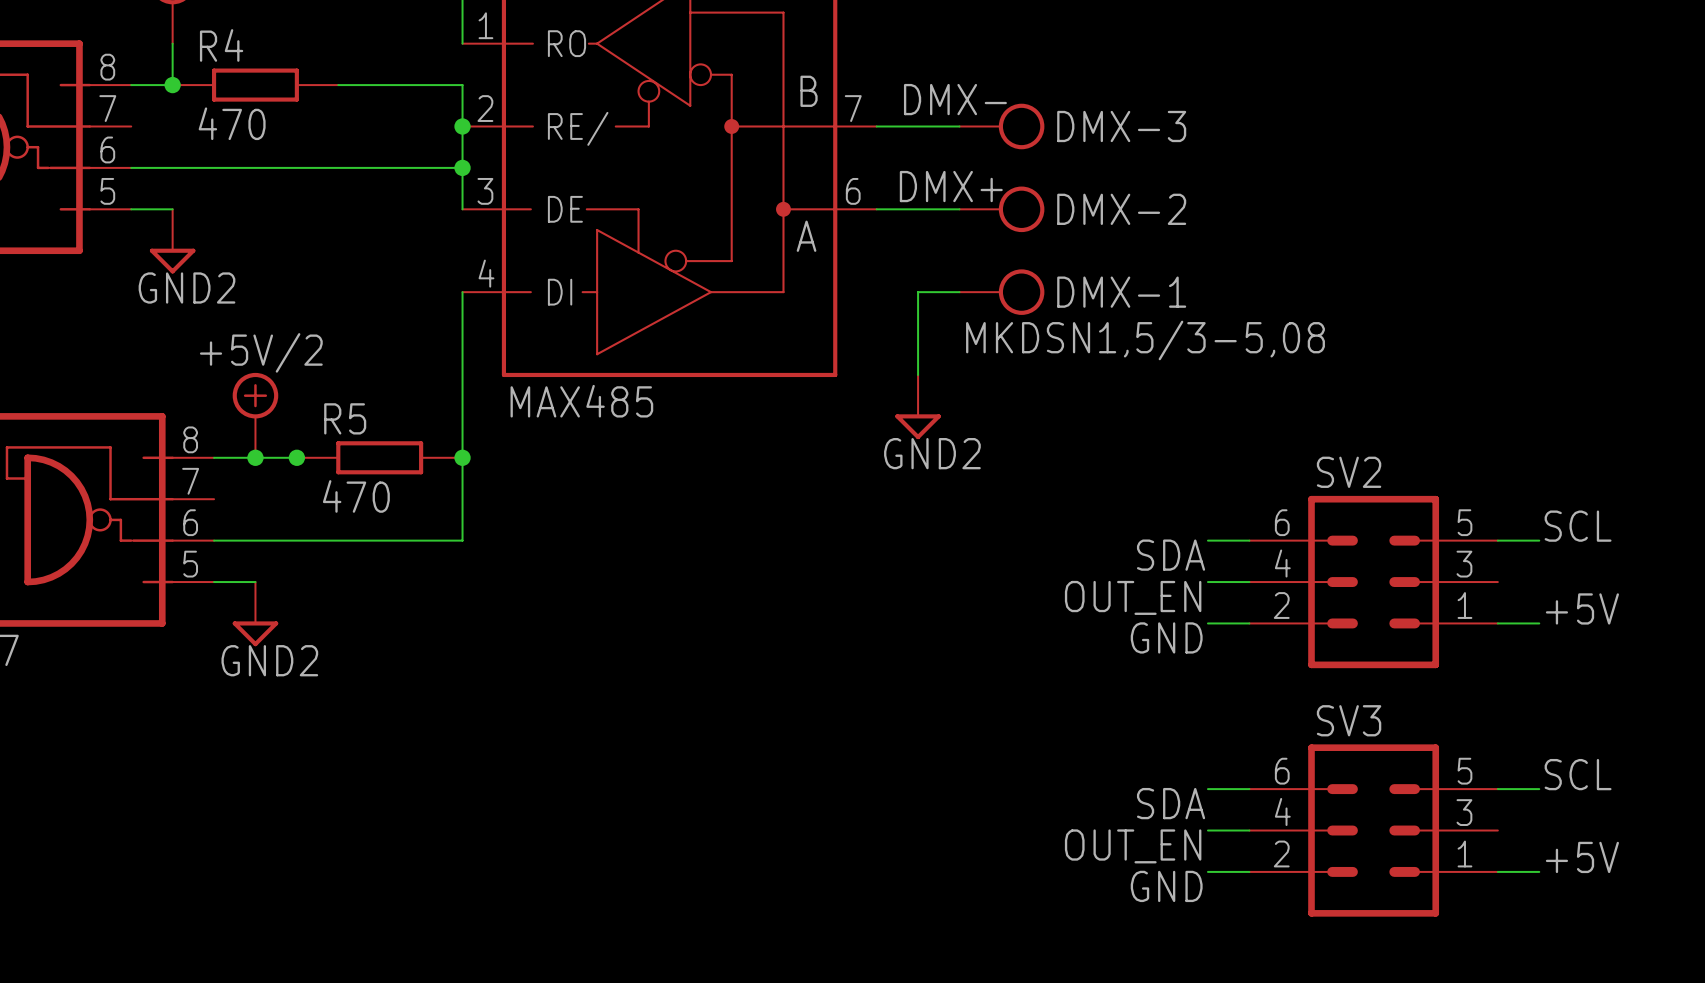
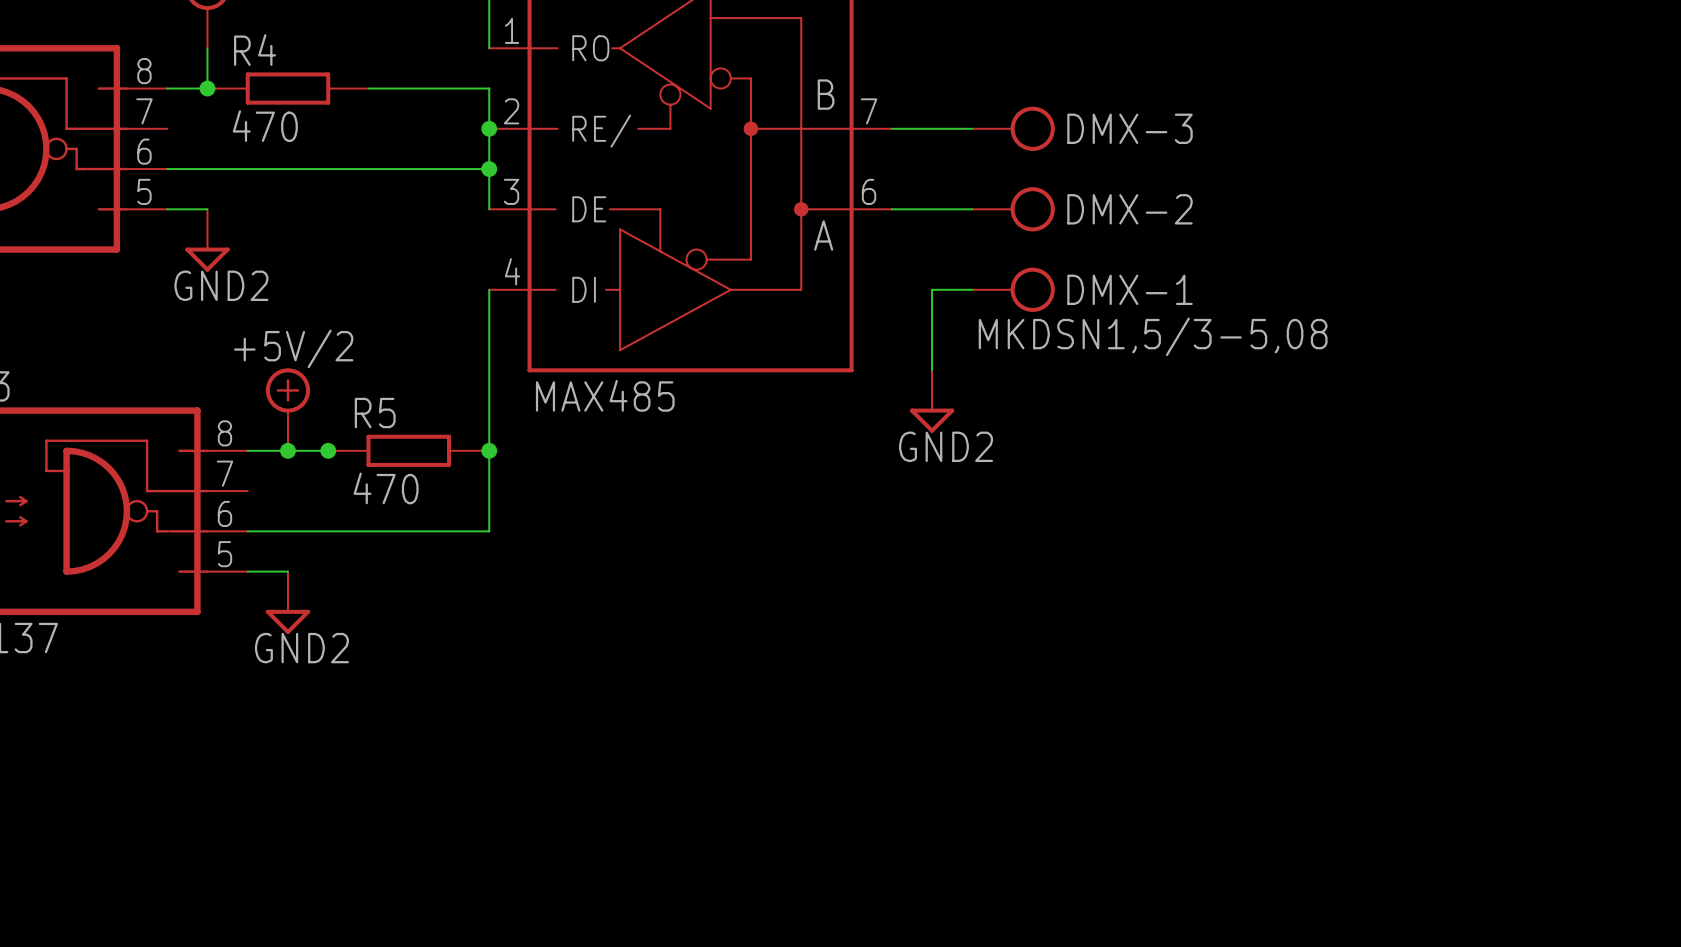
label: DMX- (955, 99) -> none
label: DMX+ (951, 186) -> none
label: SCL (1578, 526) -> none
wire: (1207, 540) (1249, 540) -> none
wire: (1497, 540) (1539, 540) -> none
label: SDA (1171, 555) -> none
wire: (1207, 582) (1249, 582) -> none
SV2: (1373, 582) -> none
label: OUT_EN (1133, 597) -> none
label: +5V (1582, 608) -> none
wire: (1207, 623) (1249, 623) -> none
wire: (1497, 623) (1539, 623) -> none
label: GND (1166, 637) -> none
label: SCL (1578, 774) -> none
wire: (1207, 789) (1249, 789) -> none
wire: (1497, 789) (1539, 789) -> none
label: SDA (1171, 803) -> none
wire: (1207, 830) (1249, 830) -> none
SV3: (1373, 830) -> none
label: OUT_EN (1133, 846) -> none
label: +5V (1582, 857) -> none
wire: (1207, 871) (1249, 871) -> none
wire: (1497, 871) (1539, 871) -> none
label: GND (1166, 886) -> none

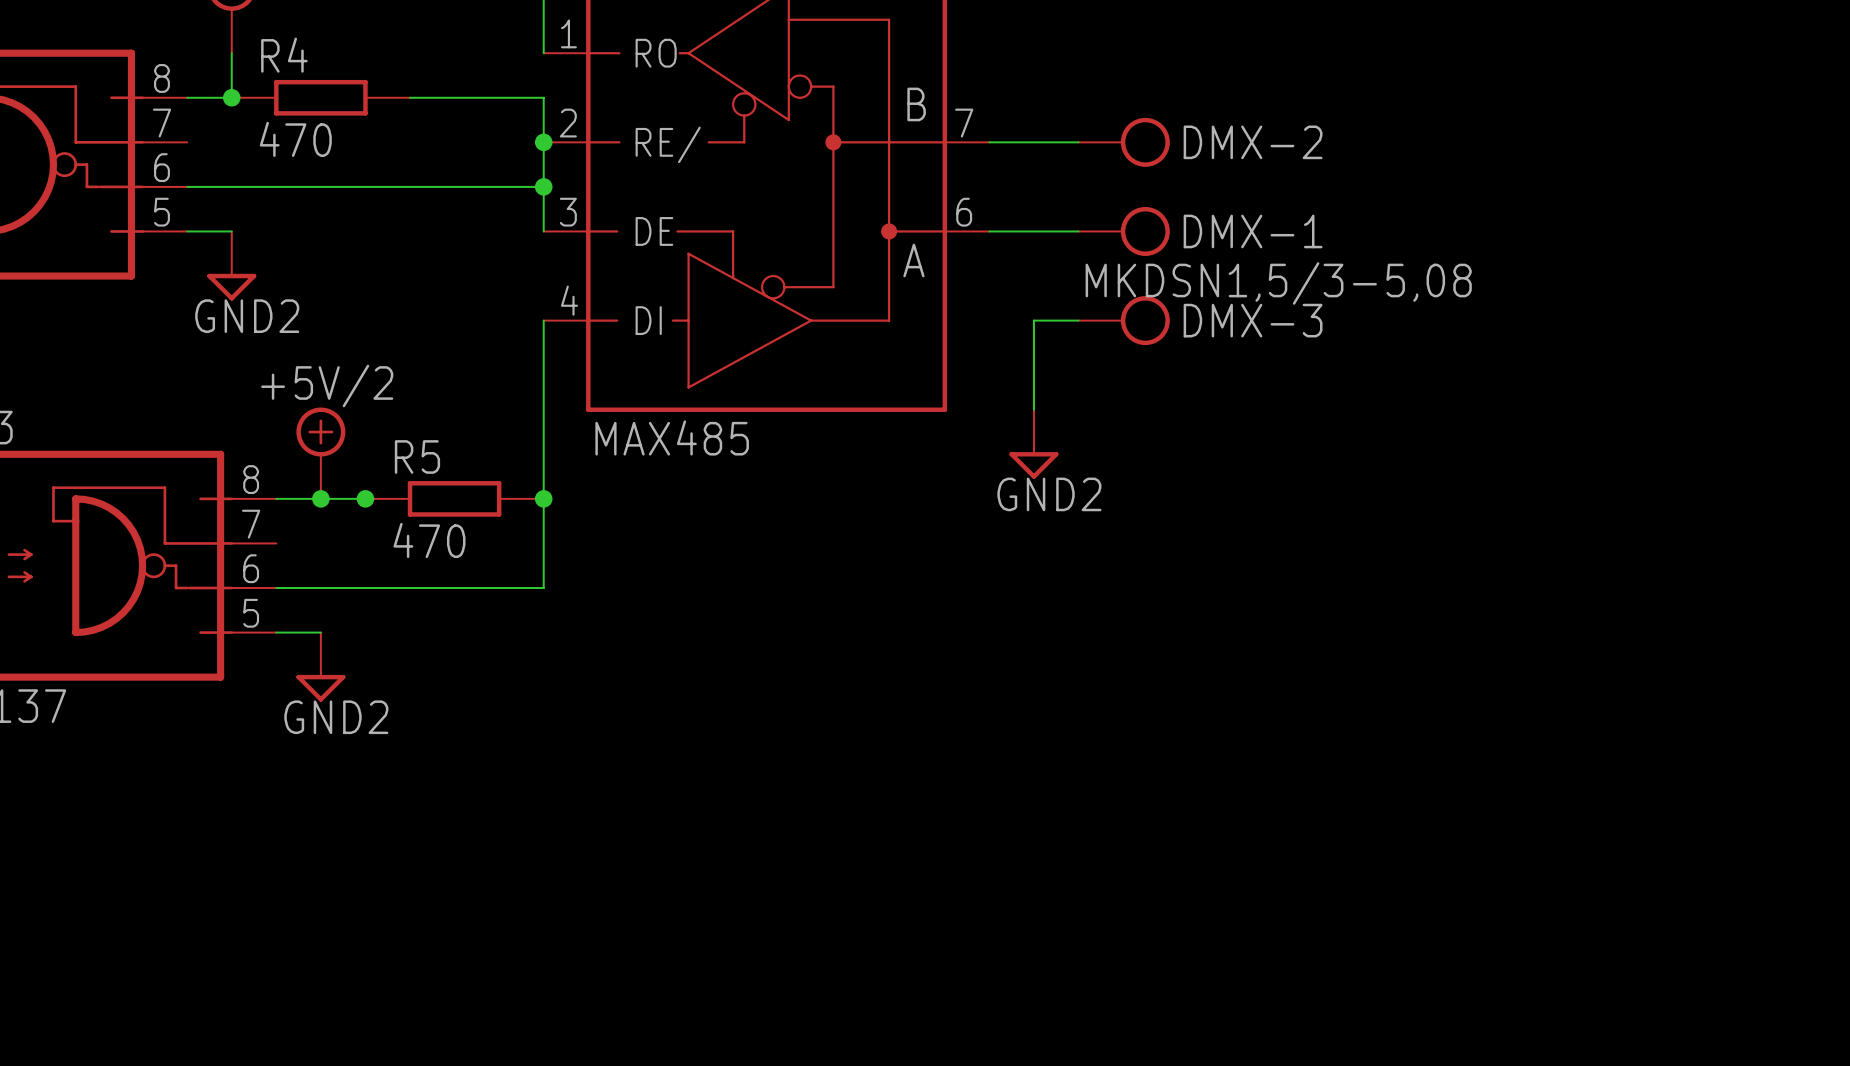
DMX-3 name: DMX-3 (1130, 128) -> DMX-2 (1253, 142)
DMX-2 name: DMX-2 (1130, 209) -> DMX-1 (1253, 231)
DMX-2 value: none -> MKDSN1,5/3-5,08 (1278, 283)
DMX-1 name: DMX-1 (1130, 289) -> DMX-3 (1253, 320)
DMX-1 value: MKDSN1,5/3-5,08 (1153, 336) -> none

